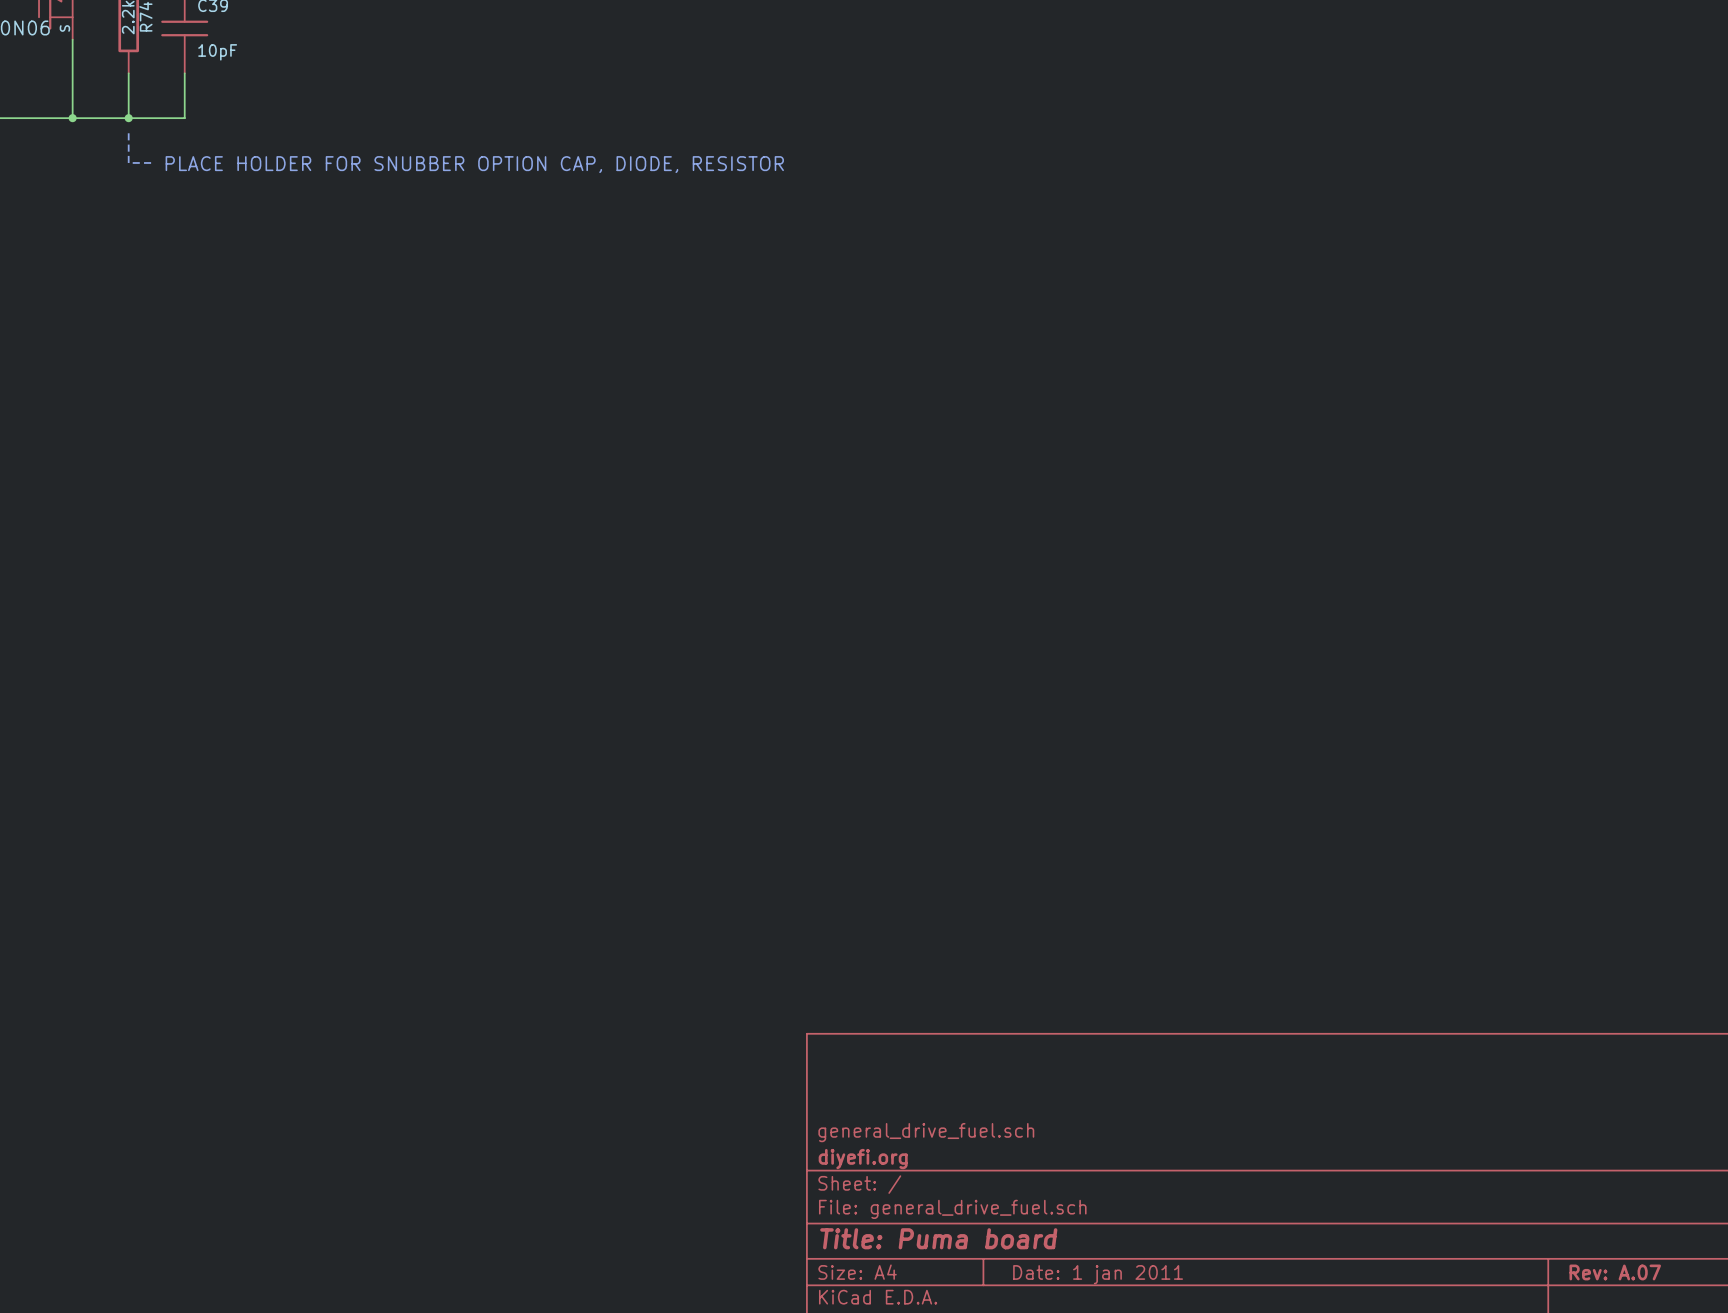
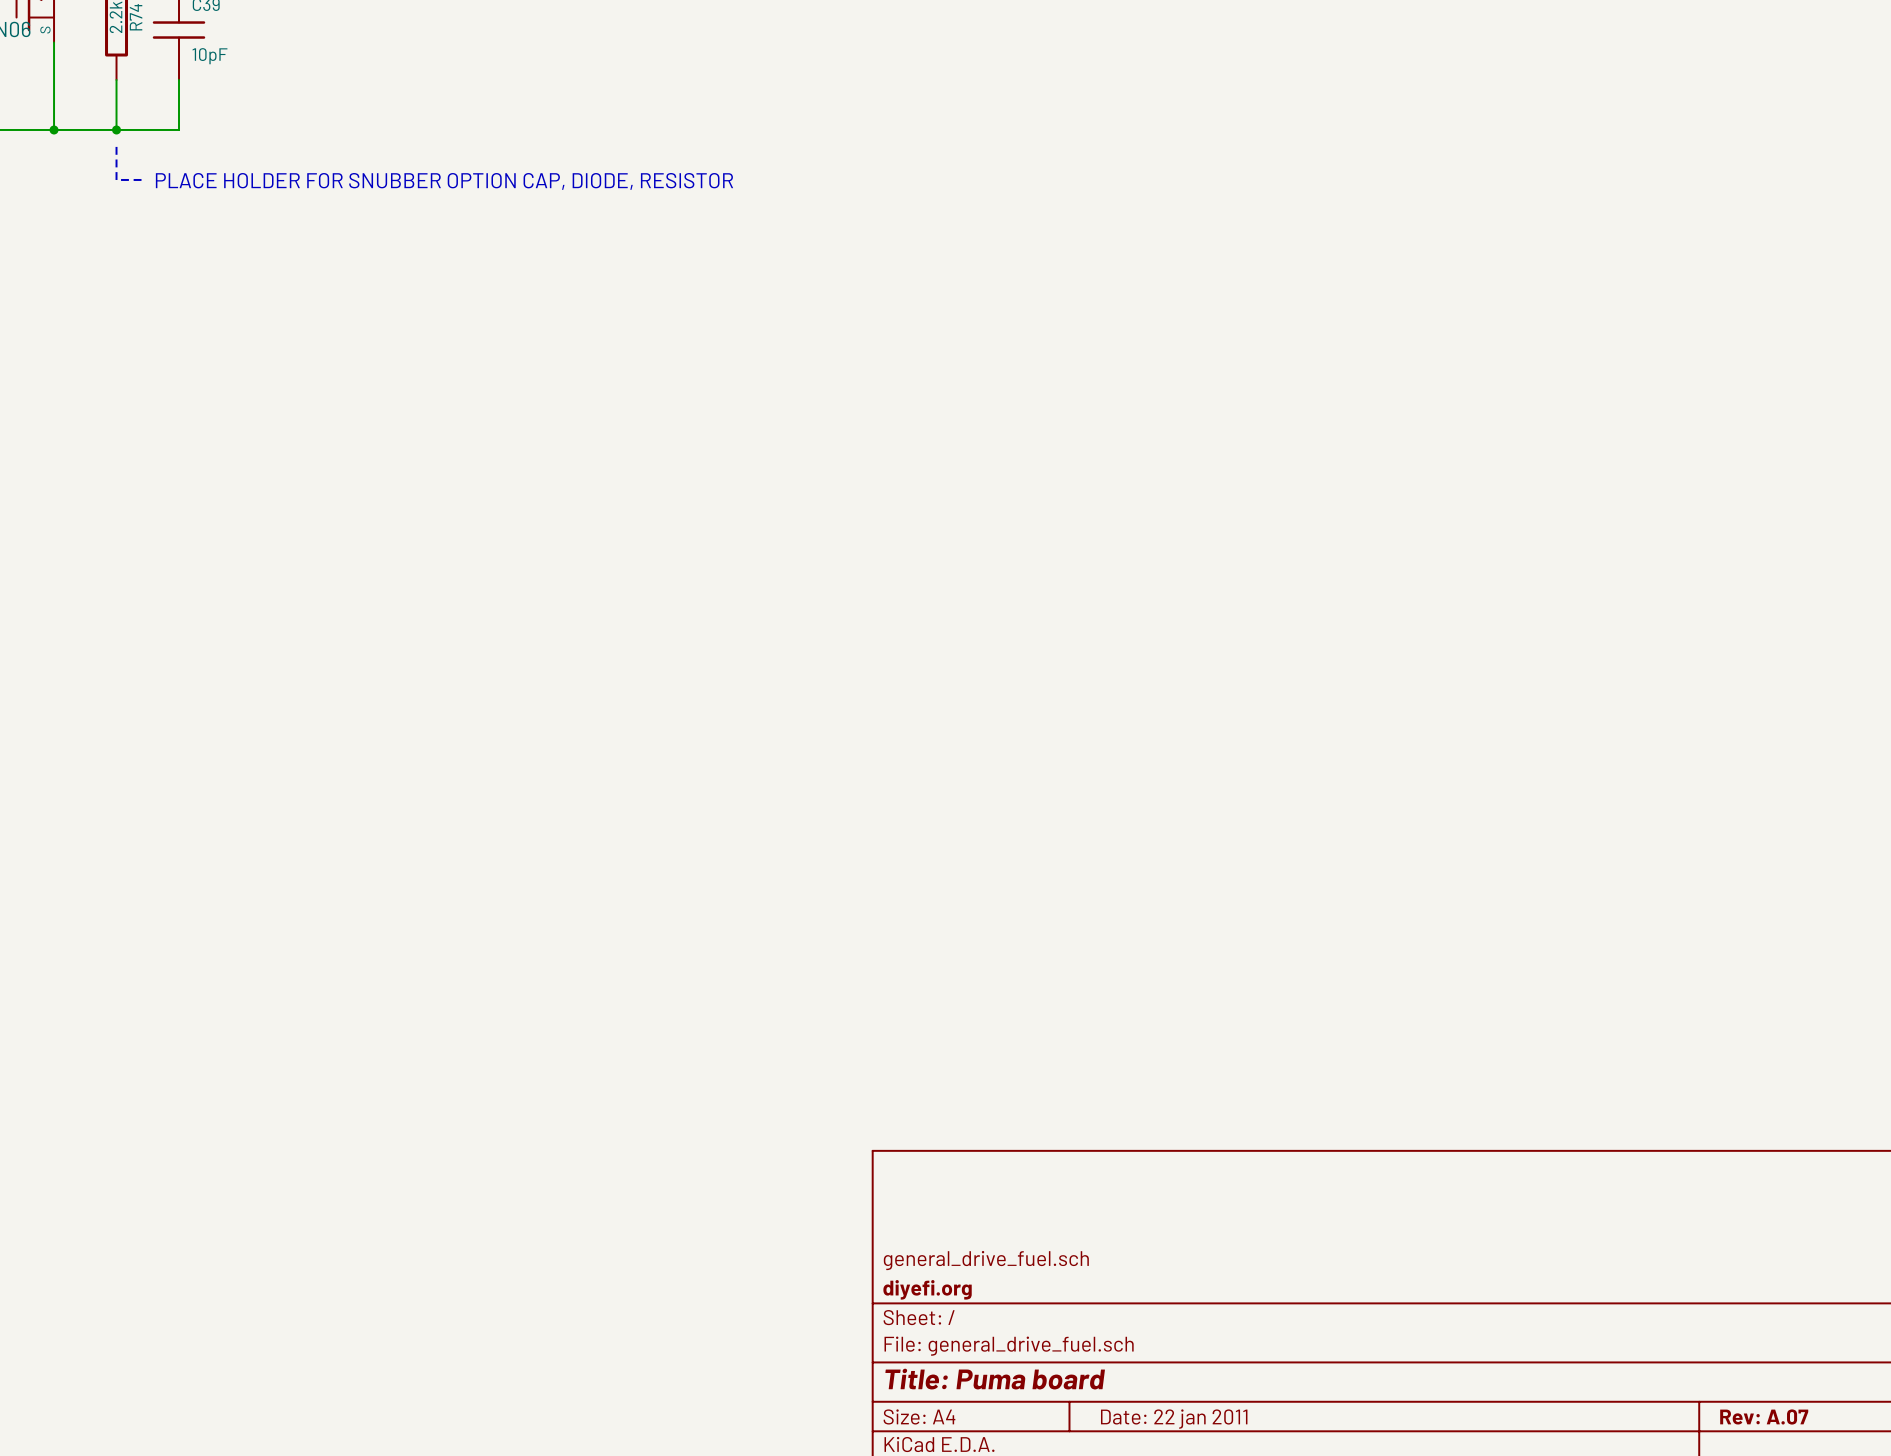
title block: Date: 1 jan 2011 (1098, 1274) -> Date: 22 jan 2011 (1174, 1419)

